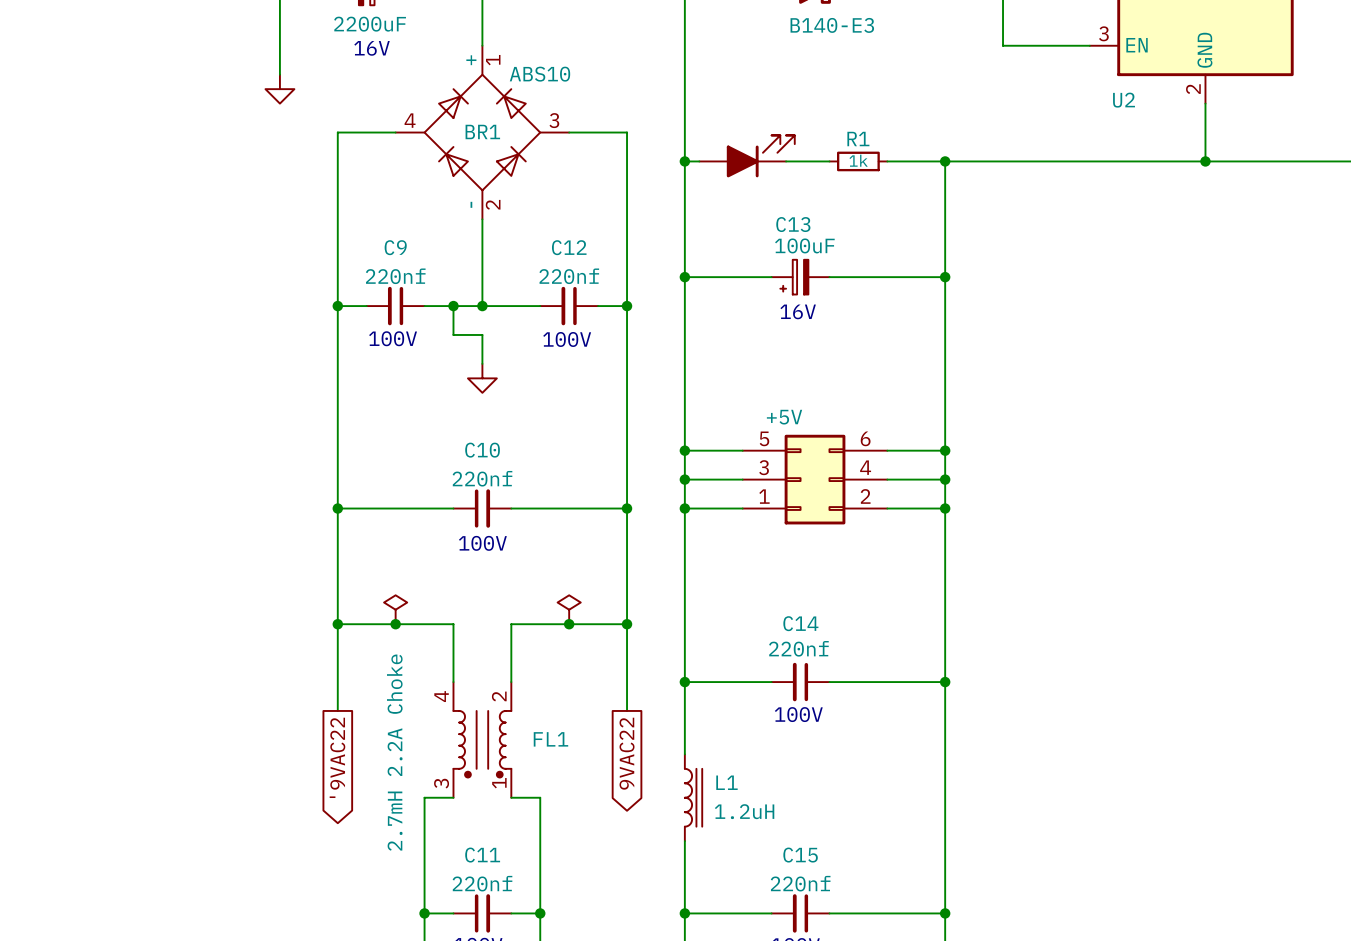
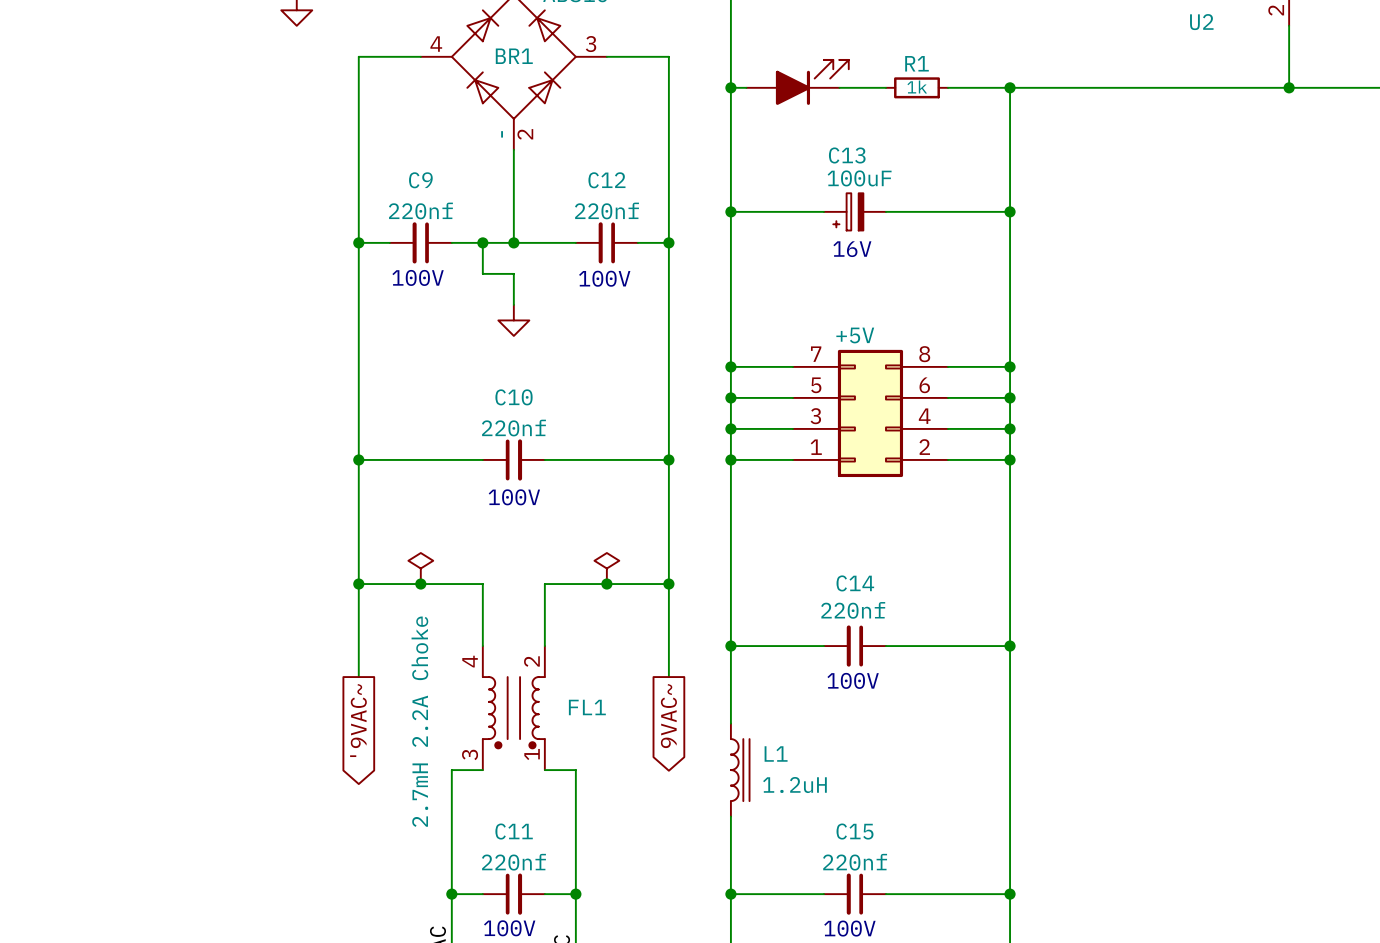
wire: none -> (730, 366) (792, 366)
junction: none -> (730, 366)
wire: none -> (948, 366) (1010, 366)
junction: none -> (1010, 366)
part: none -> +5V (870, 413)
part: +5V (815, 479) -> none
global label: 9VAC22 (627, 753) -> 9VAC~ (668, 716)
global label: '9VAC22 (337, 757) -> '9VAC~ (358, 720)

